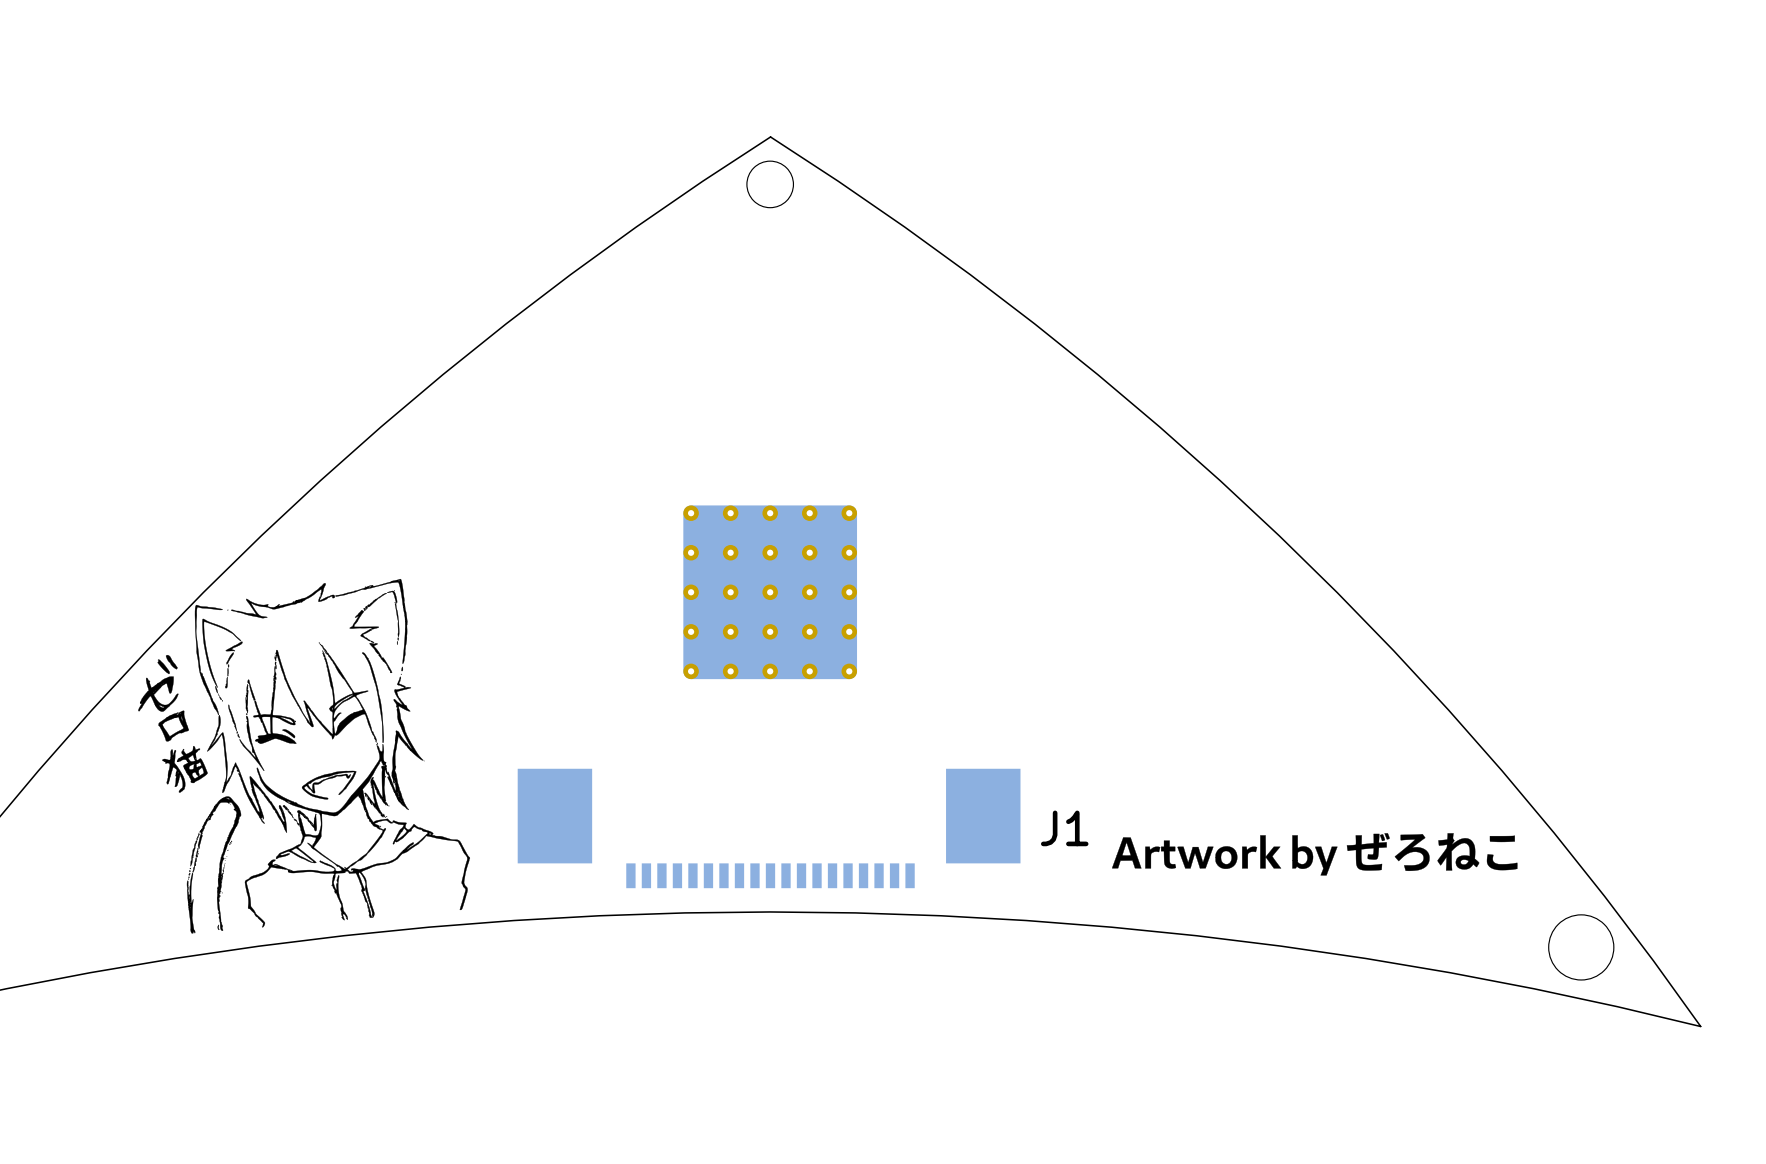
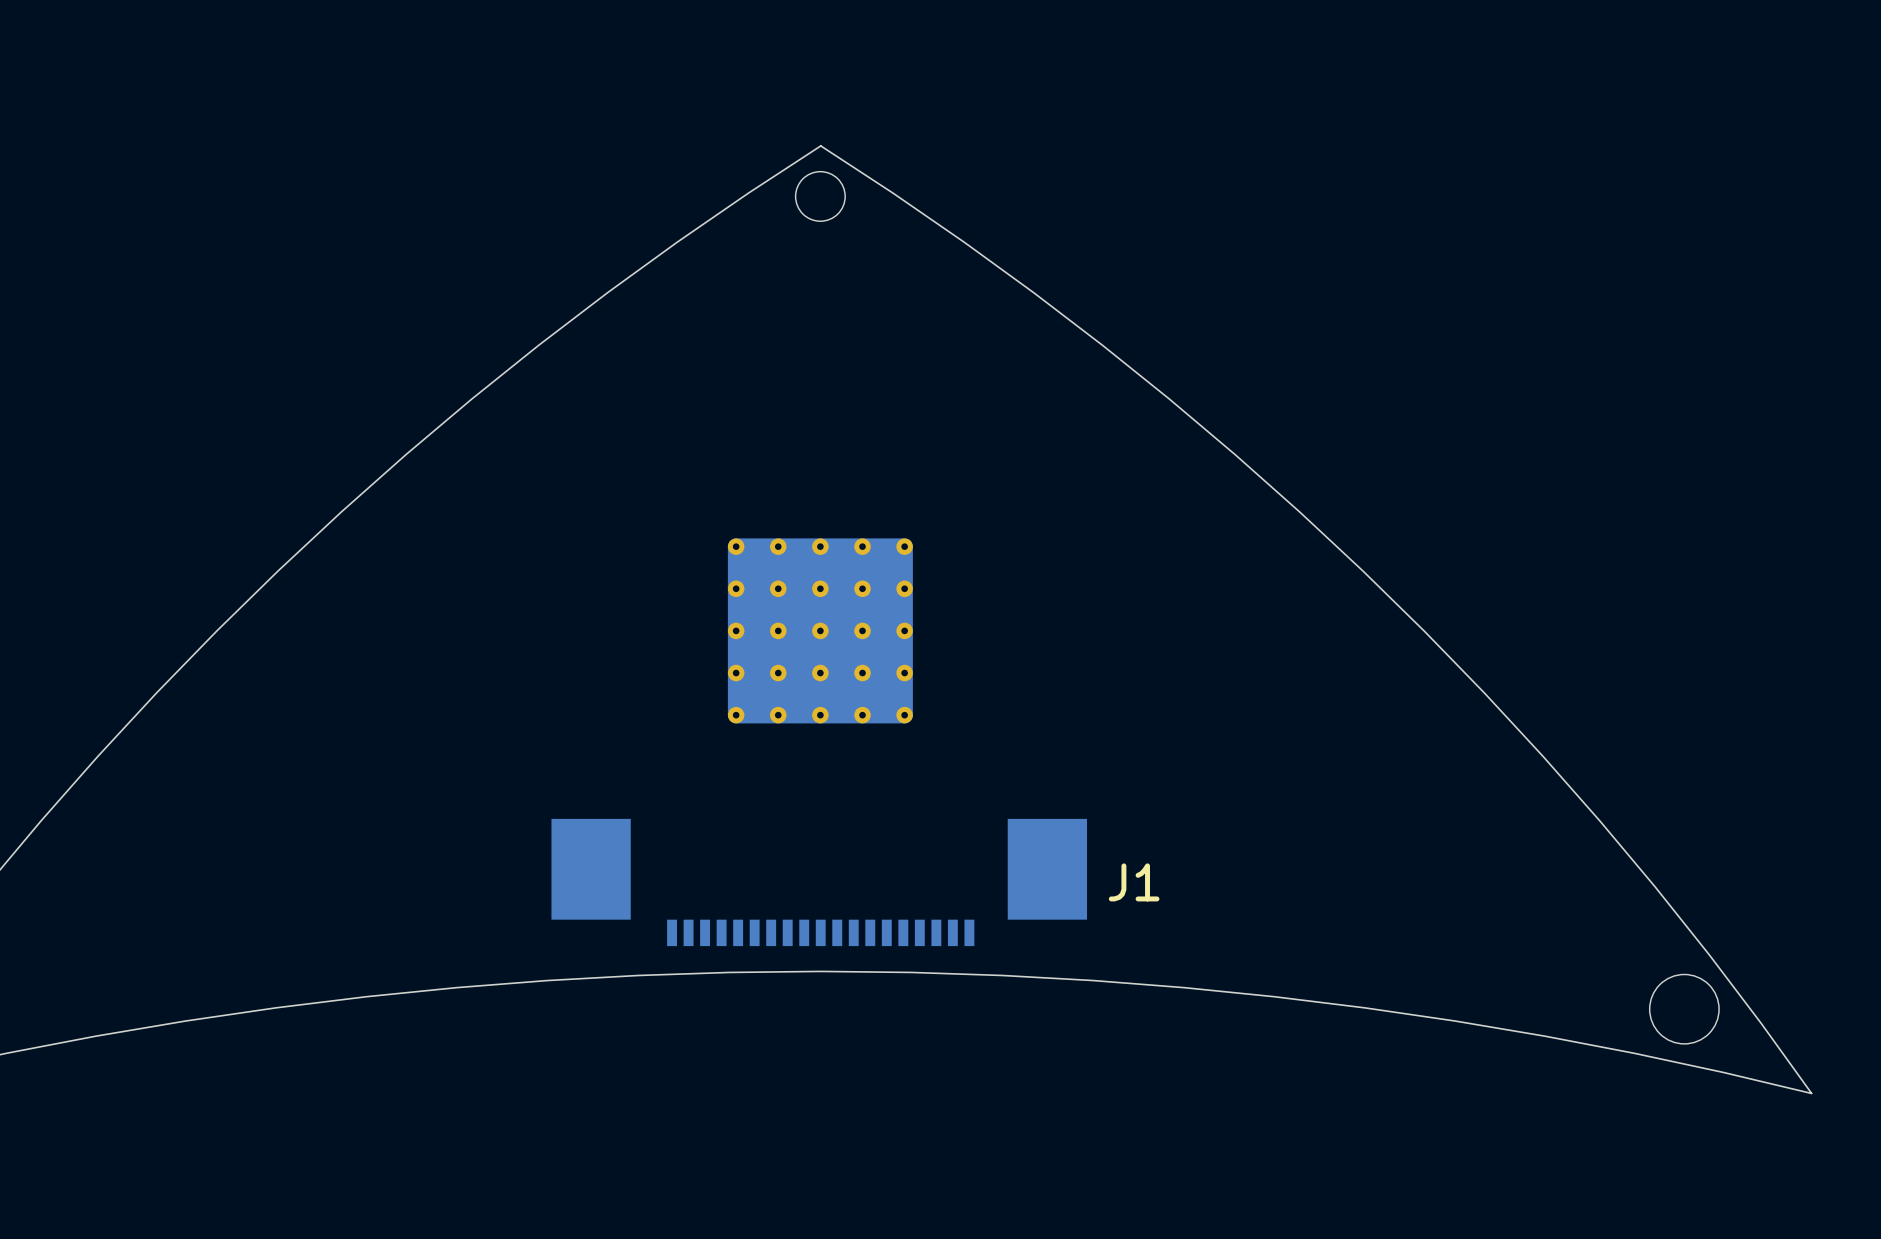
drawing: [138, 578, 471, 934] -> none
drawing: [1112, 833, 1518, 876] -> none

